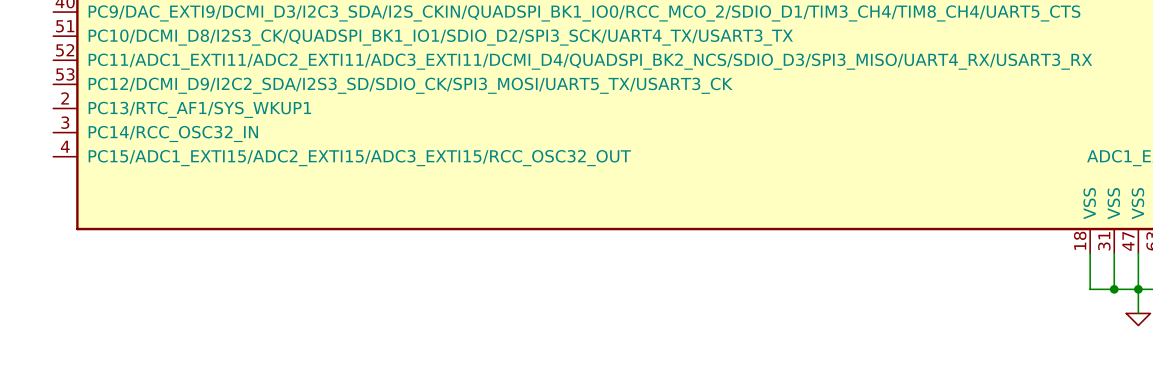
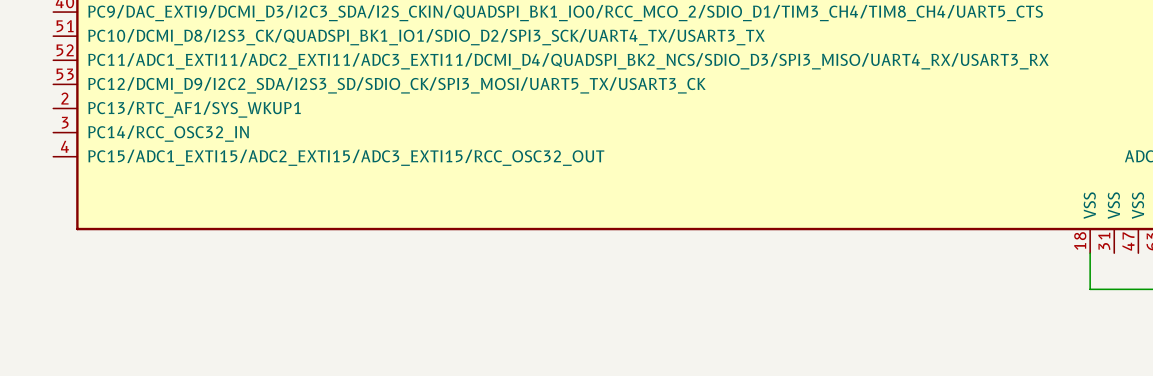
wire: (1114, 253) (1114, 289) -> none
wire: (1138, 253) (1138, 313) -> none
junction: (1114, 289) -> none
junction: (1138, 289) -> none
power symbol: (1138, 319) -> none

